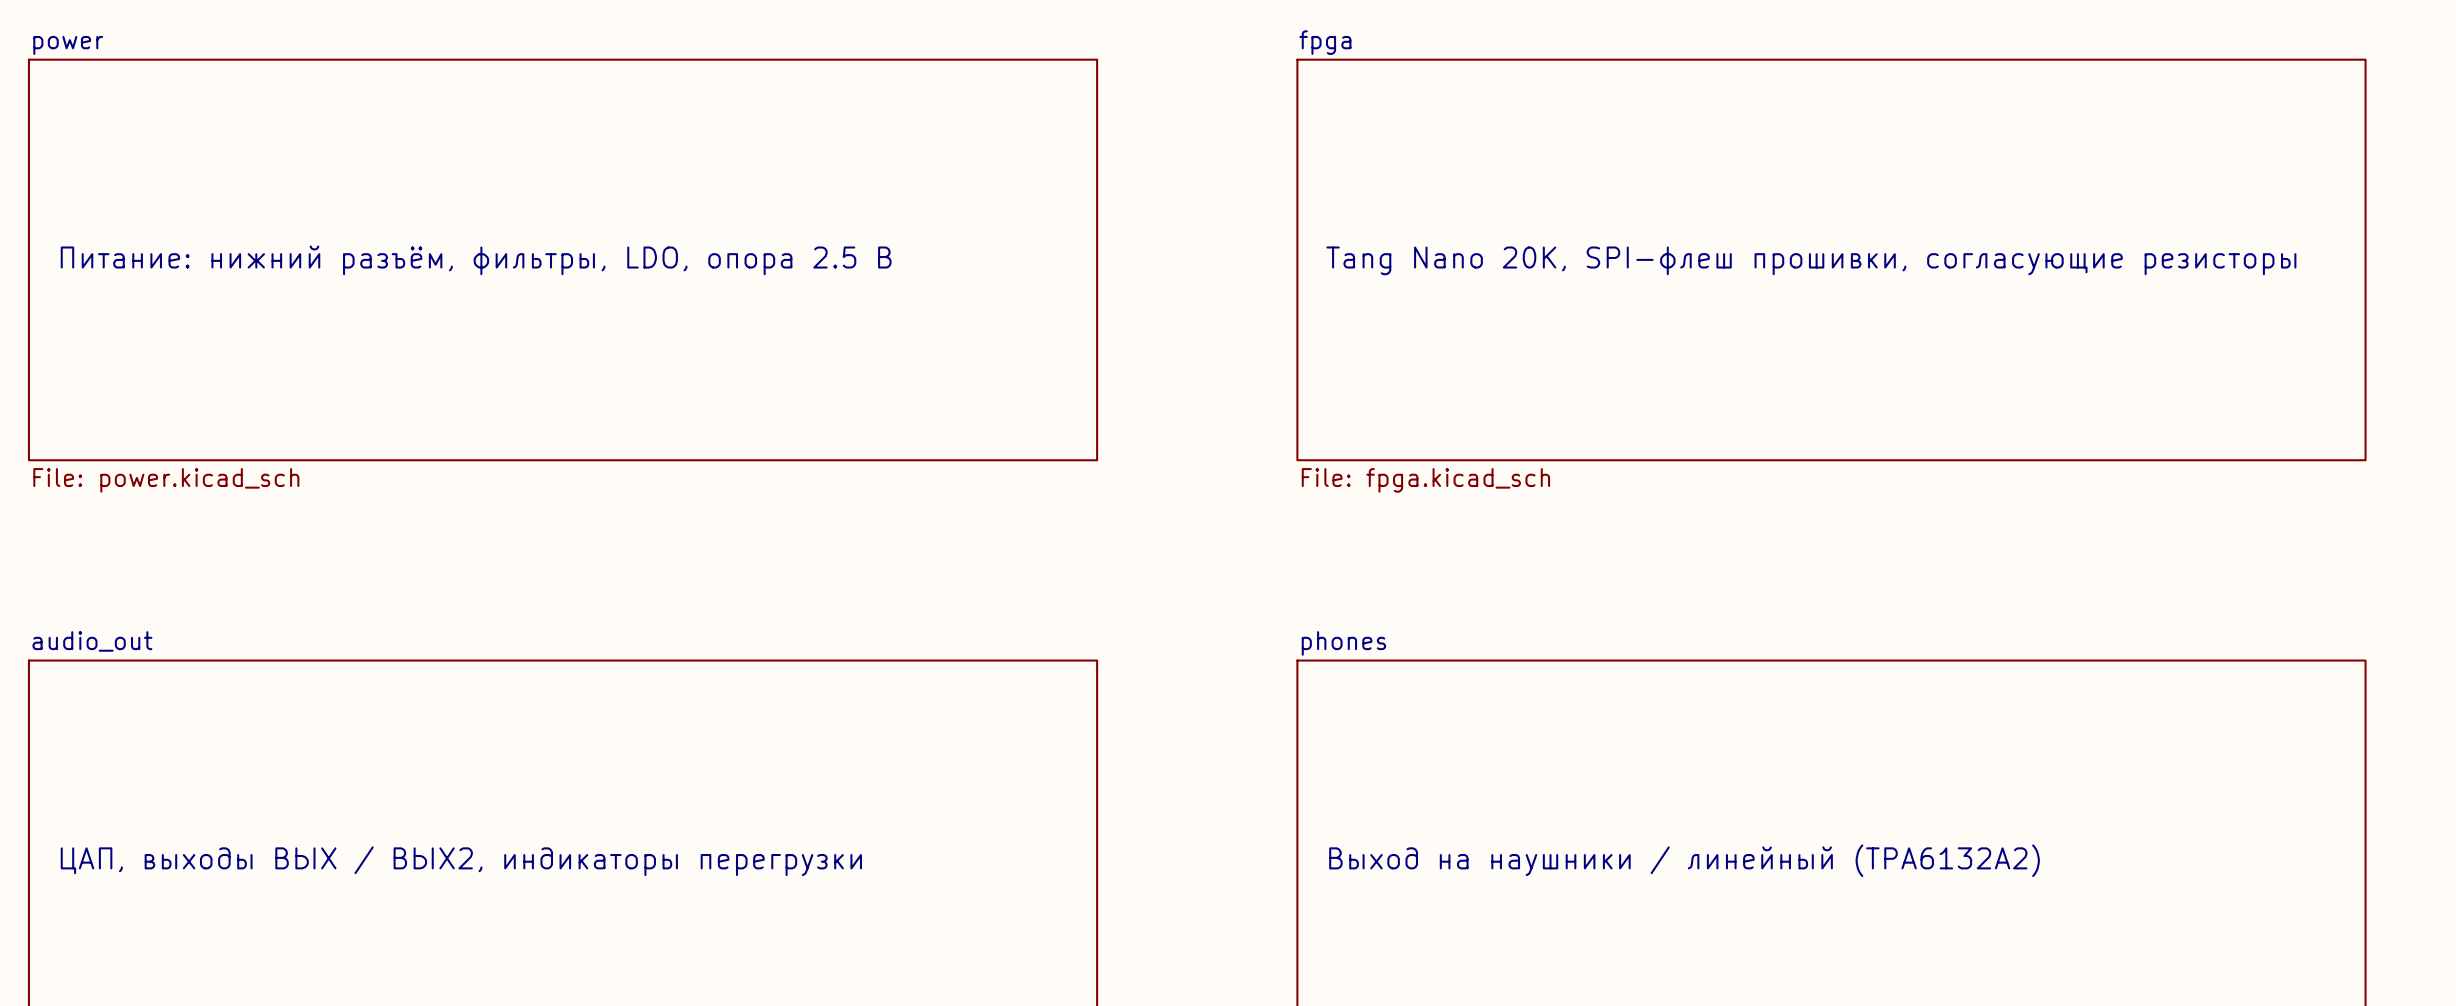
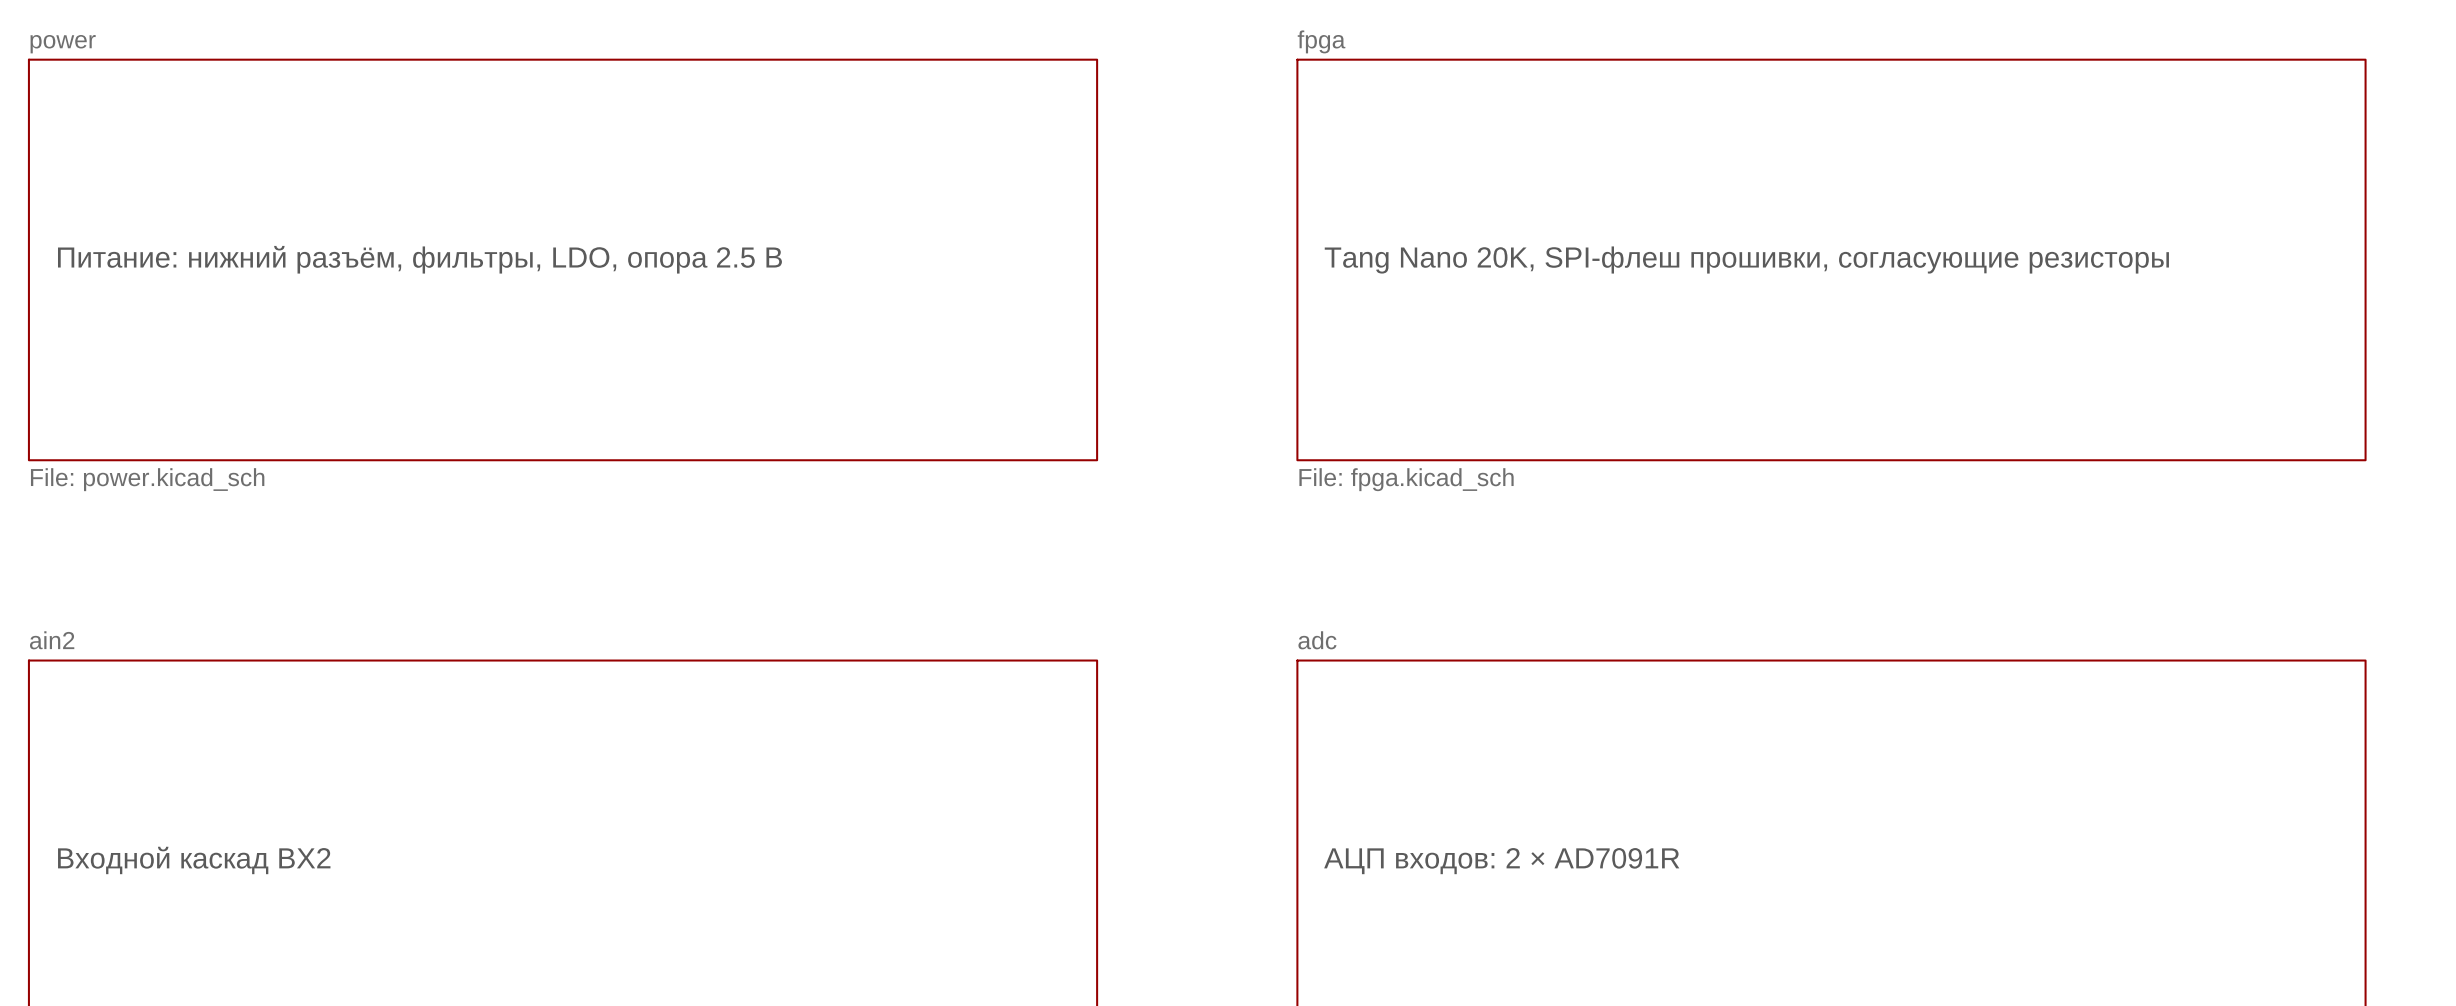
sheet audio_out name: audio_out (92, 641) -> ain2 (52, 640)
sheet phones name: phones (1343, 643) -> adc (1317, 640)
text: Выход на наушники / линейный (TPA6132A2) (1684, 860) -> АЦП входов: 2 × AD7091R (1501, 861)
text: ЦАП, выходы ВЫХ / ВЫХ2, индикаторы перегрузки (461, 861) -> Входной каскад ВХ2 (194, 860)

